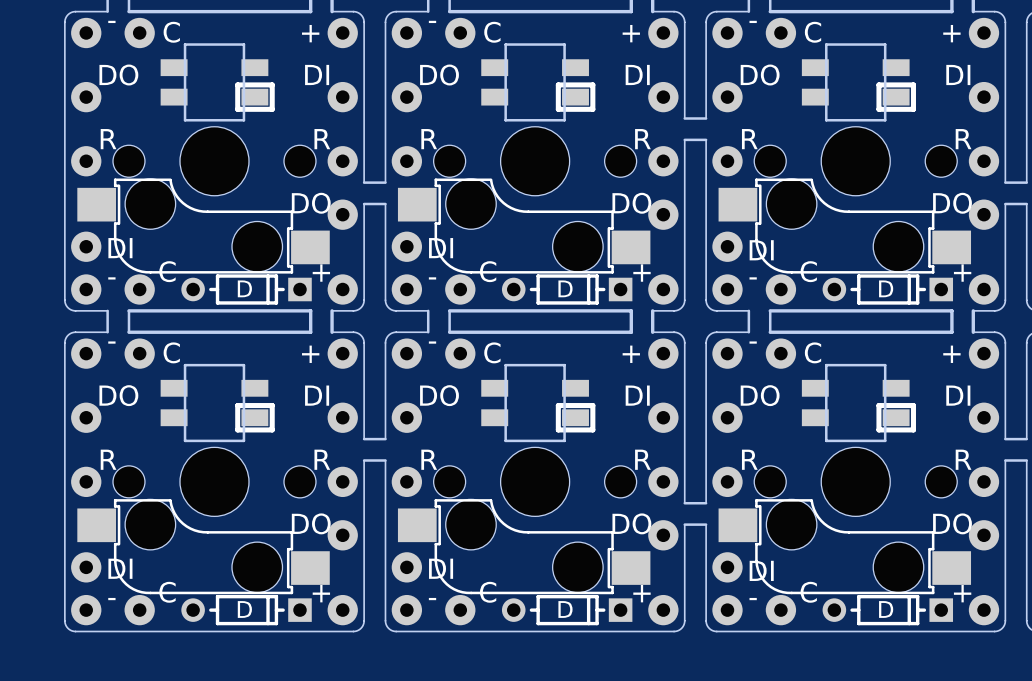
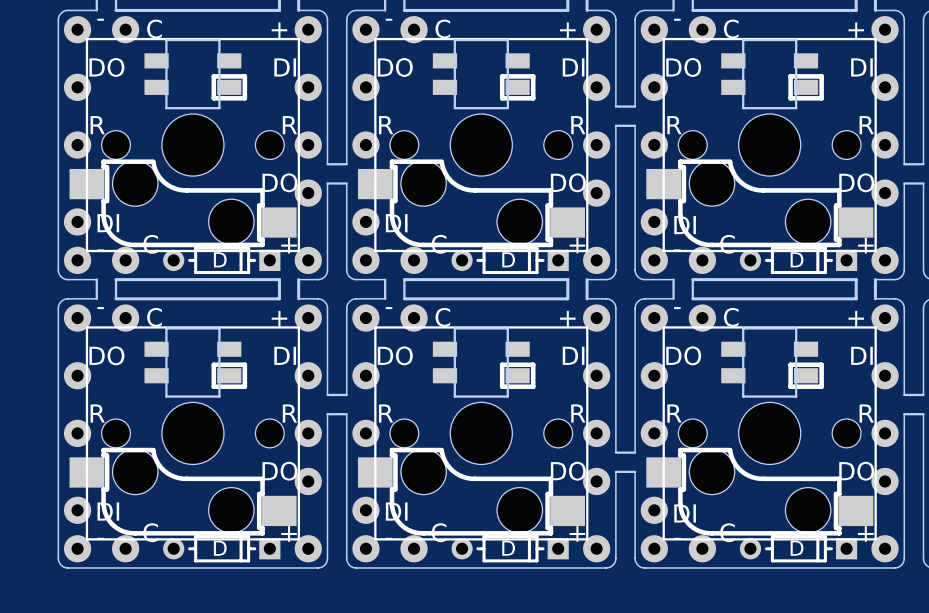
part: none -> (184, 145)
part: none -> (473, 145)
part: none -> (761, 145)
part: (203, 200) -> none
part: (524, 200) -> none
part: (844, 200) -> none
part: none -> (184, 433)
part: none -> (473, 433)
part: none -> (761, 433)
part: (203, 520) -> none
part: (524, 520) -> none
part: (844, 520) -> none

